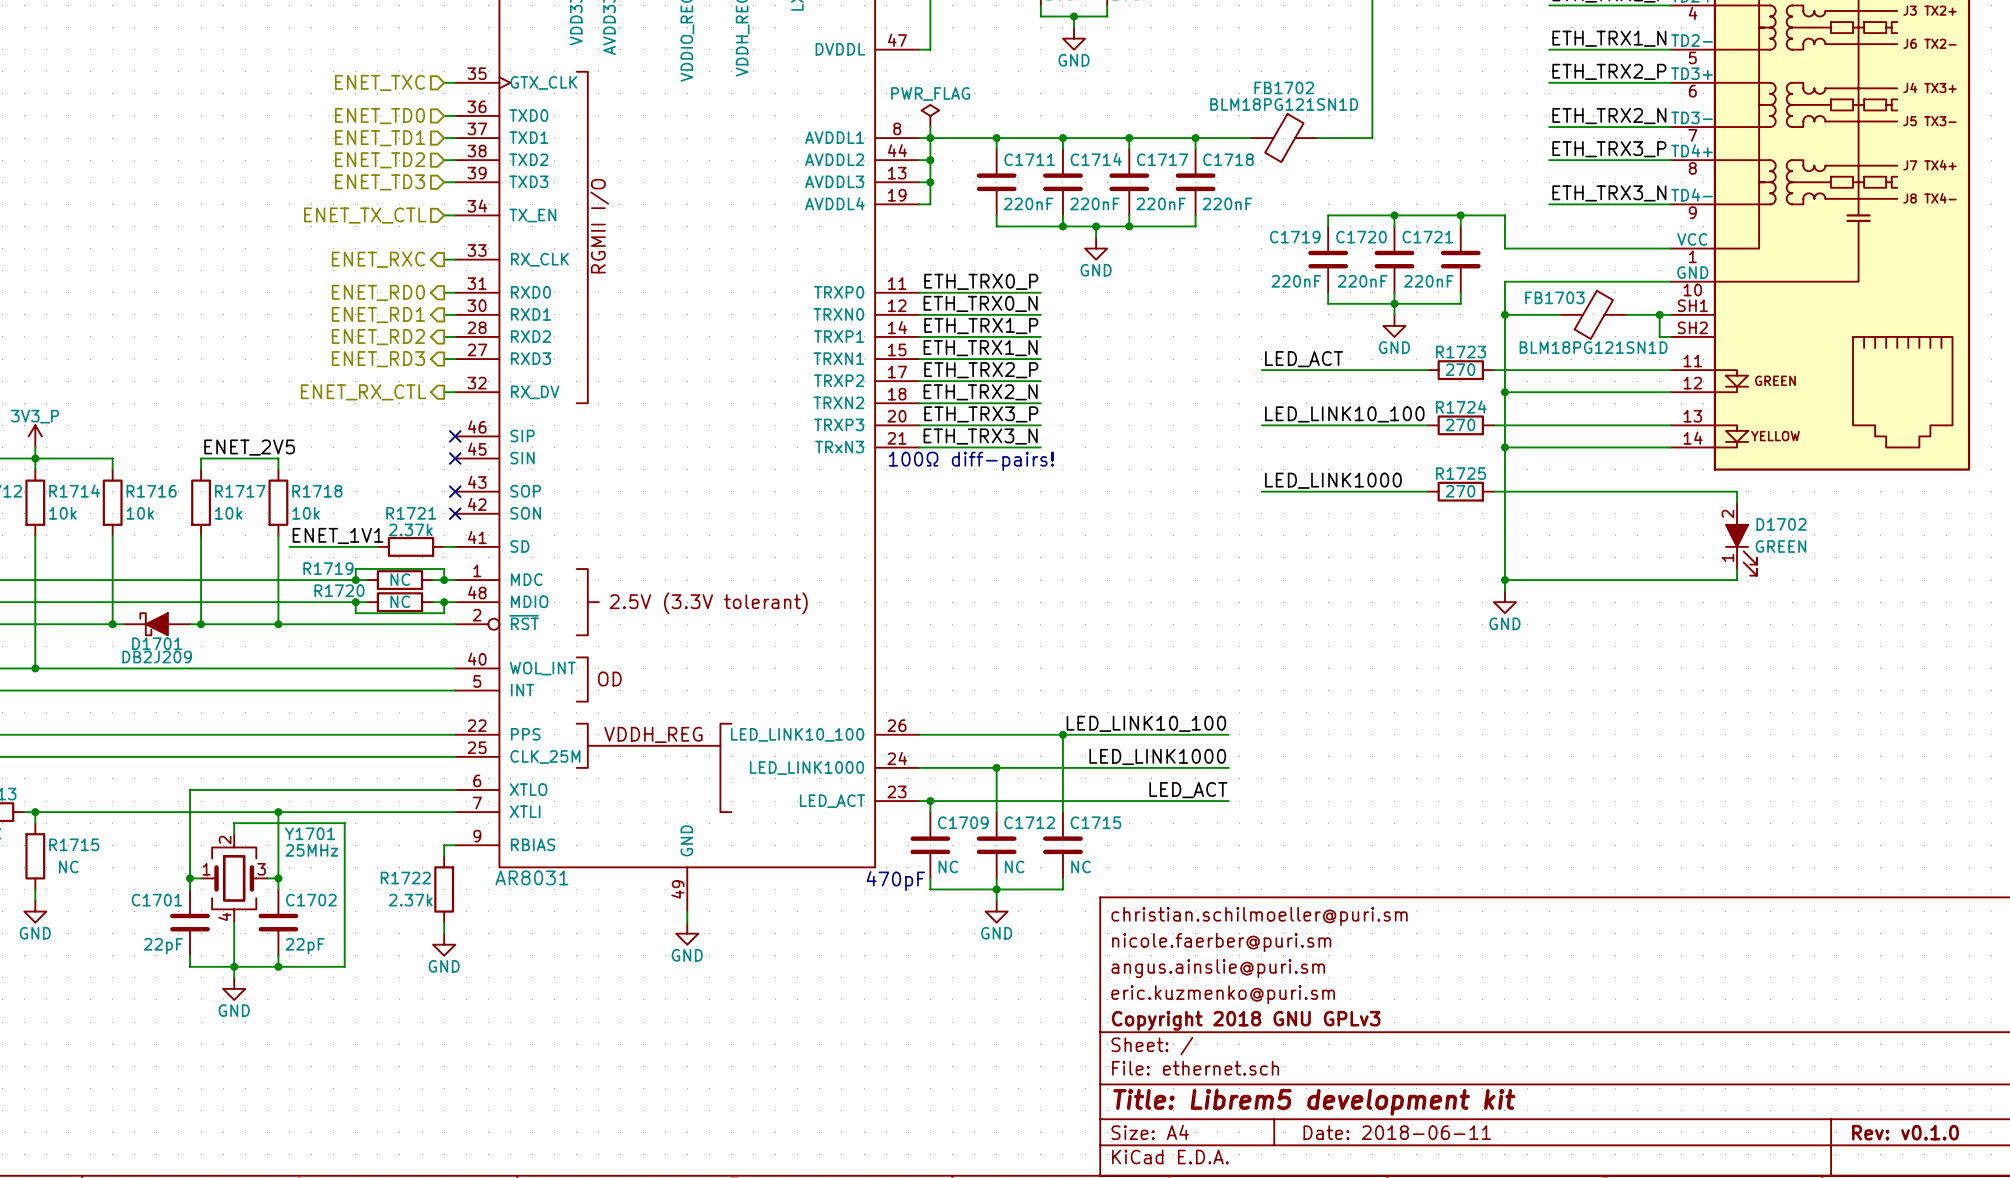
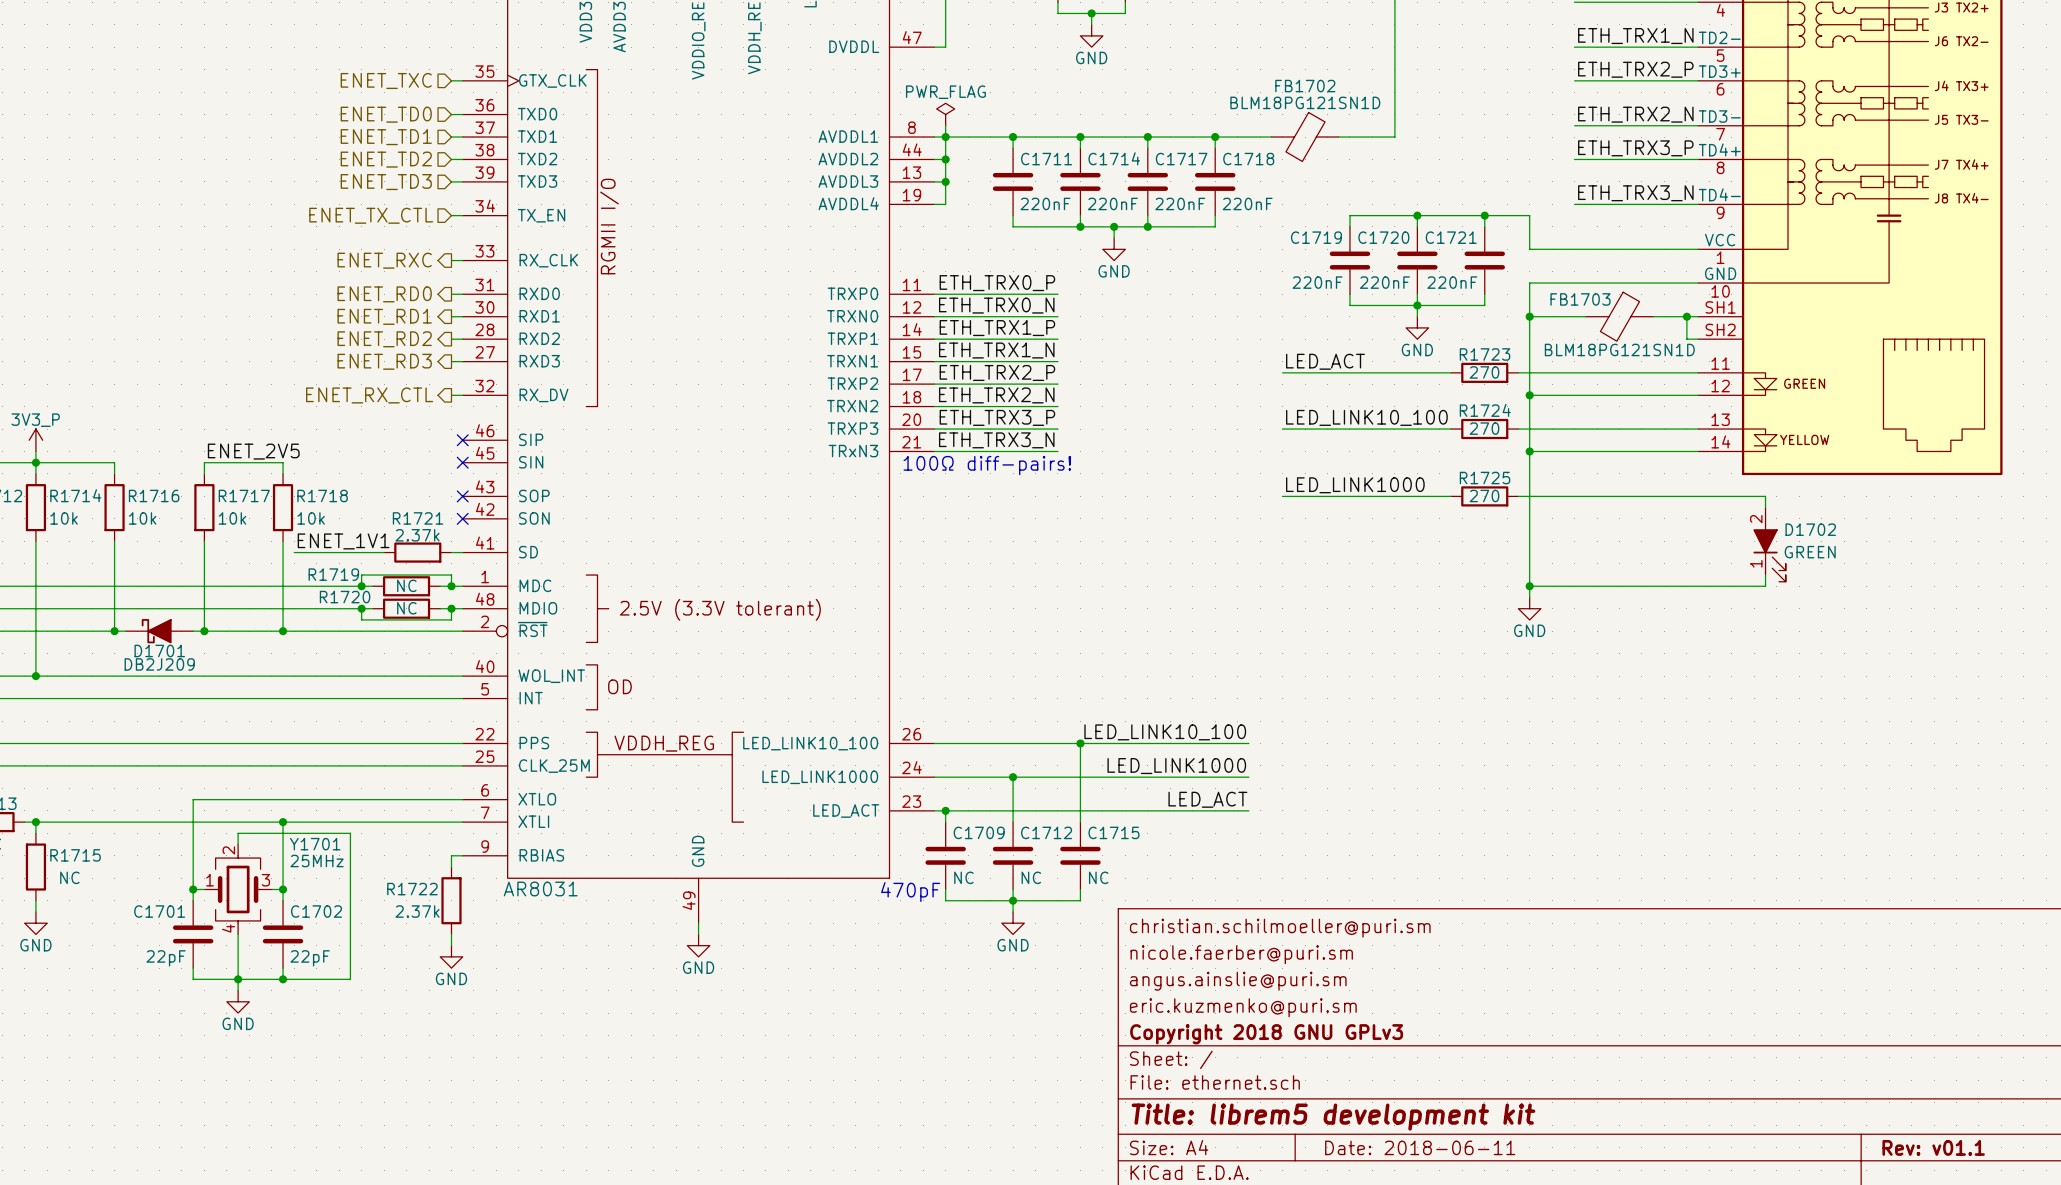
title block: Title: Librem5 development kit (1314, 1102) -> Title: librem5 development kit (1333, 1117)
title block: Rev: v0.1.0 (1905, 1132) -> Rev: v01.1 (1933, 1147)

